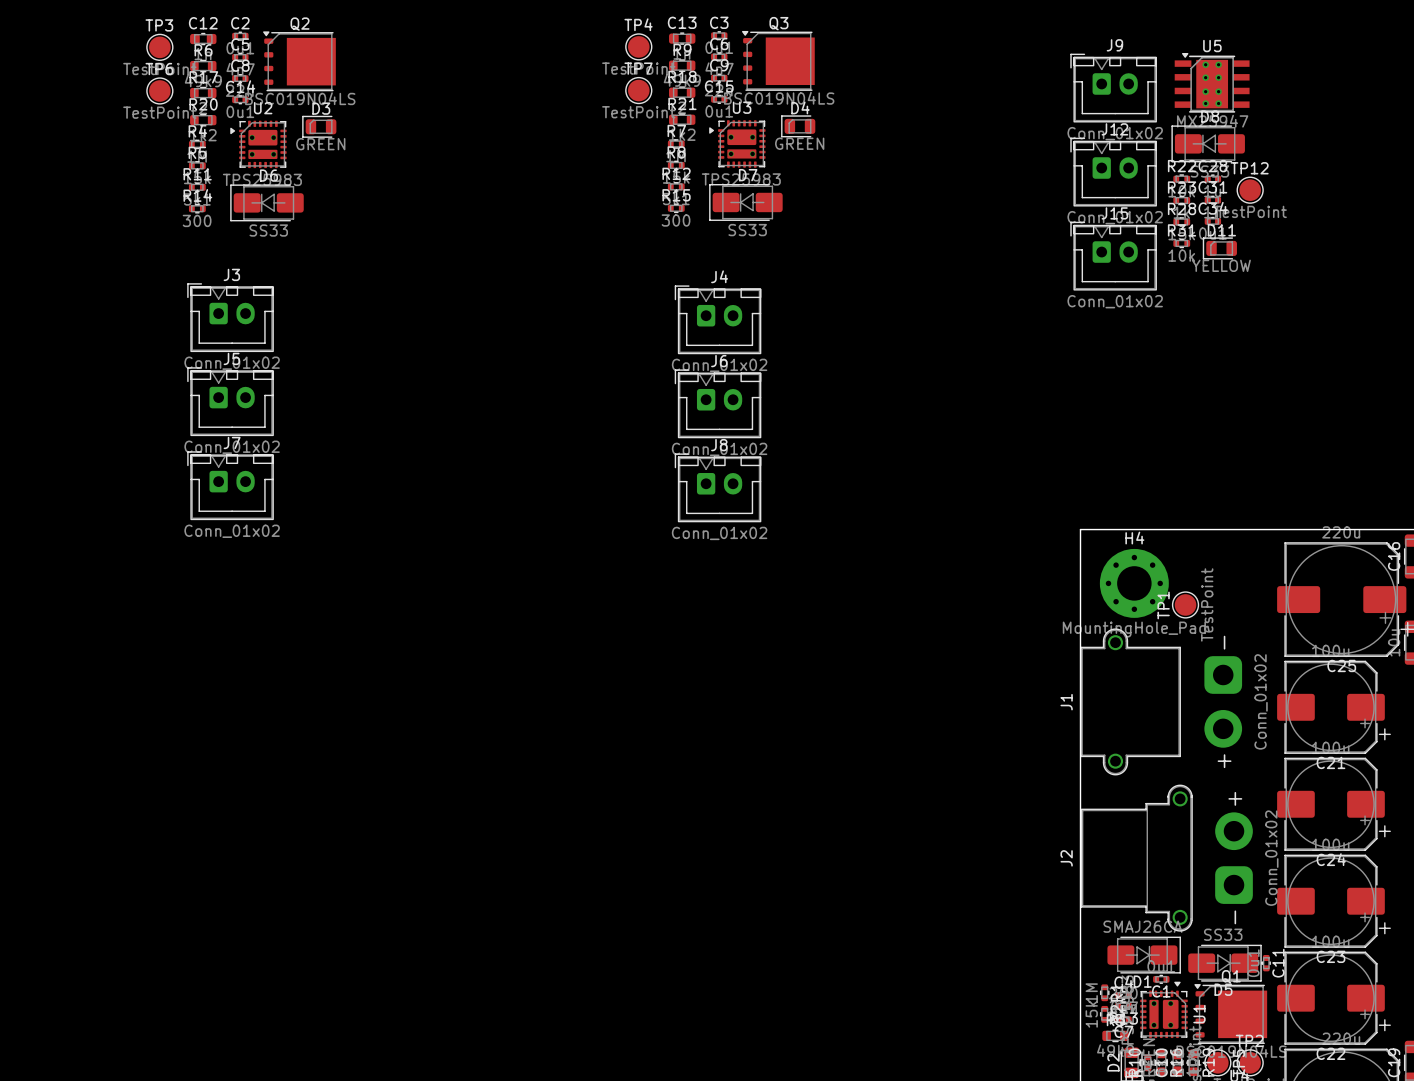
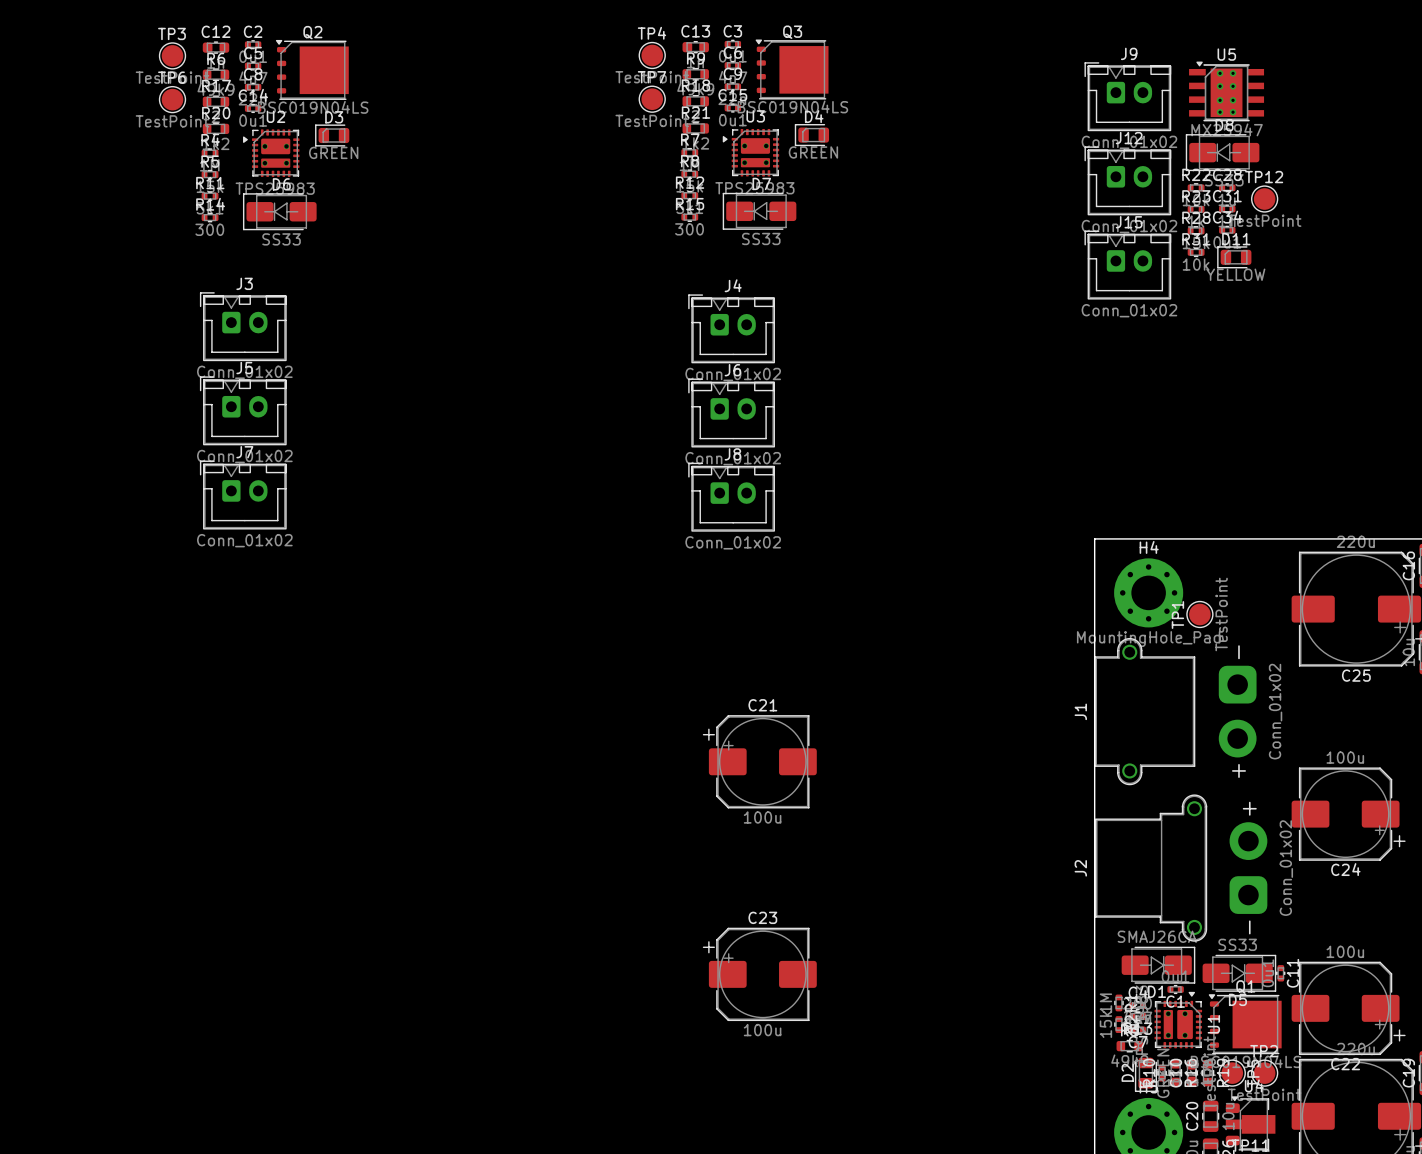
C21 rotation: 0° (1333, 707) -> 180° (759, 761)
C21 position: (1333, 707) -> (759, 761)
C23 rotation: 0° (1333, 901) -> 180° (759, 974)
C23 position: (1333, 901) -> (759, 974)

